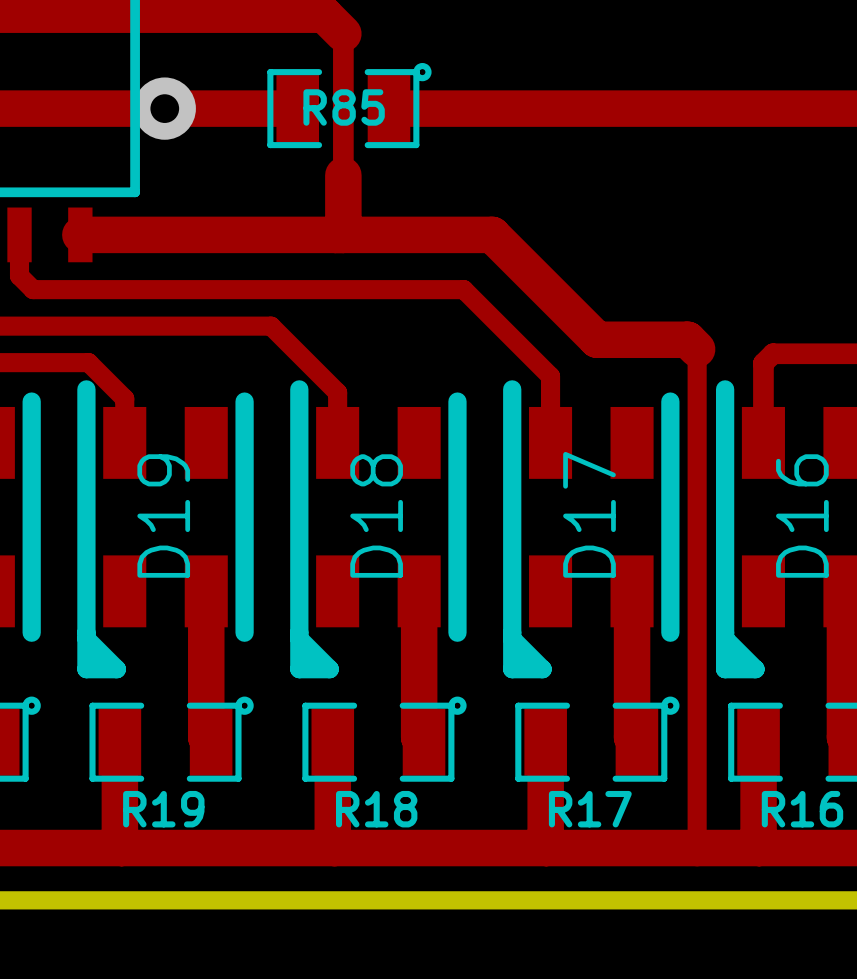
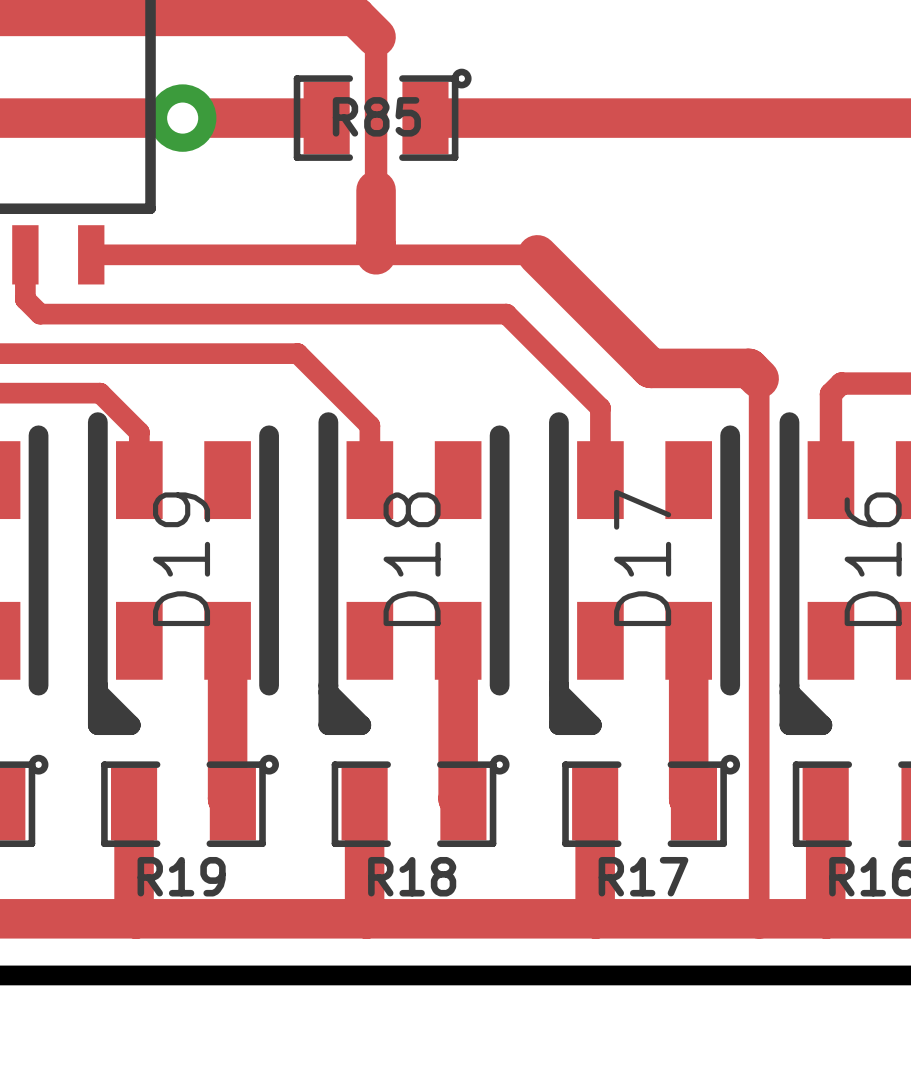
track width: thick (80, 234) (492, 234) -> thin (91, 254) (537, 254)

